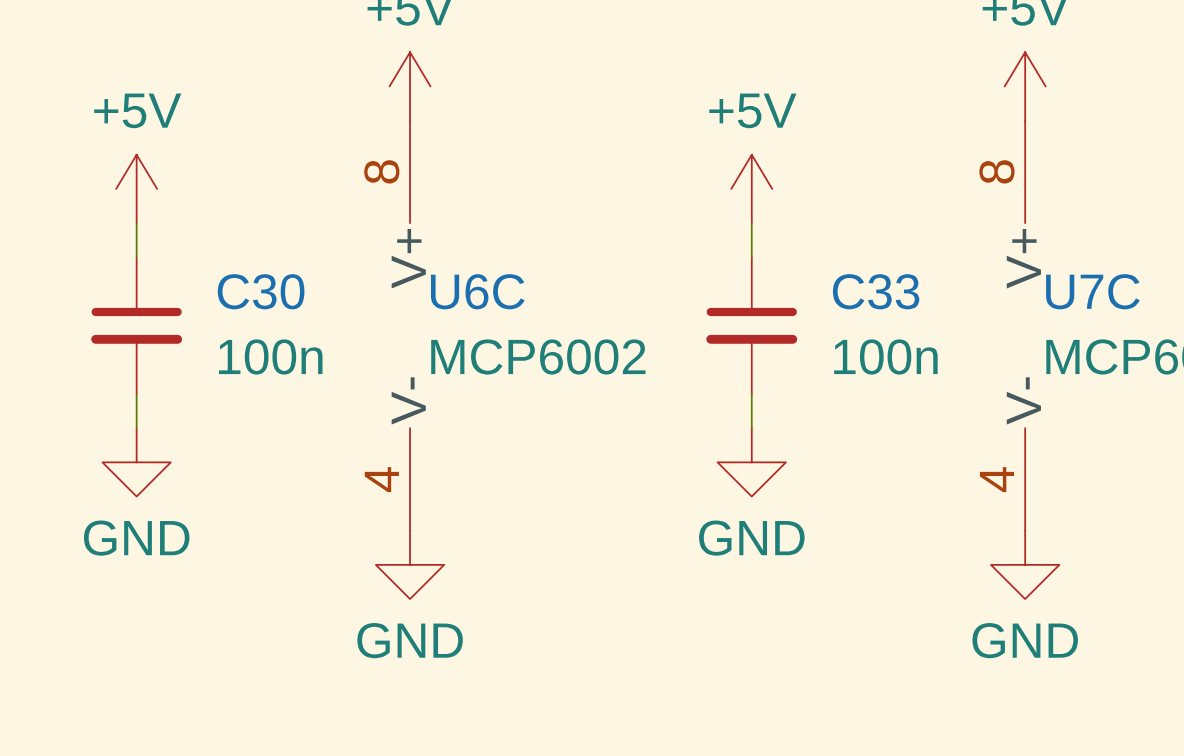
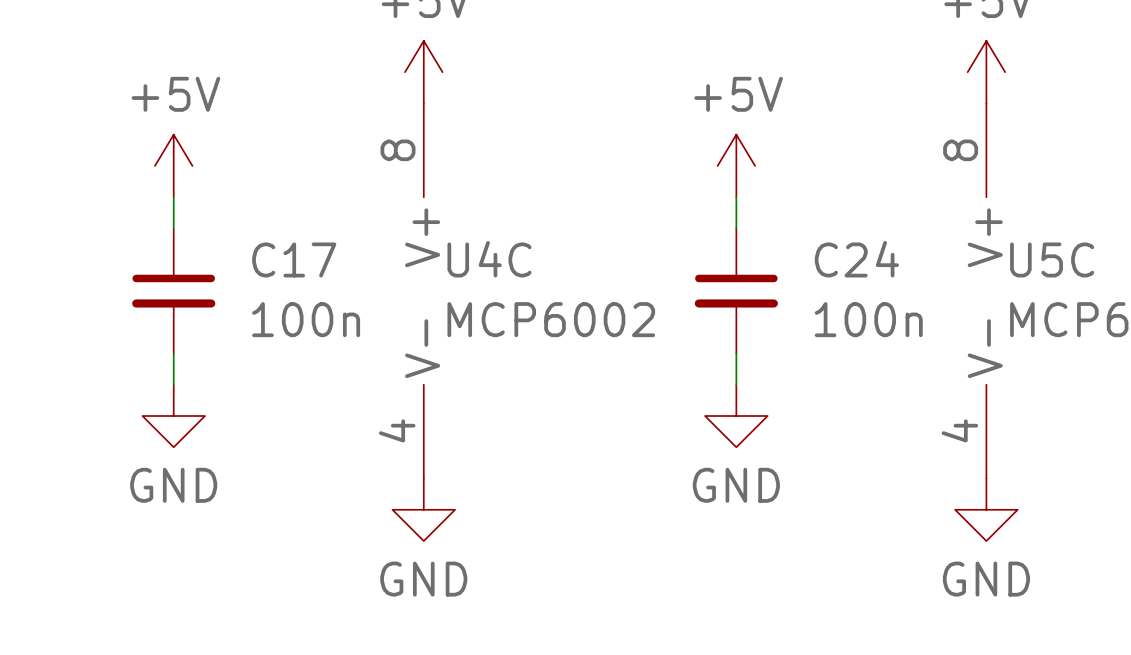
C30 name: C30 (261, 291) -> C17 (294, 259)
U6C name: U6C (477, 291) -> U4C (489, 259)
C33 name: C33 (876, 291) -> C24 (856, 259)
U7C name: U7C (1092, 291) -> U5C (1052, 259)

